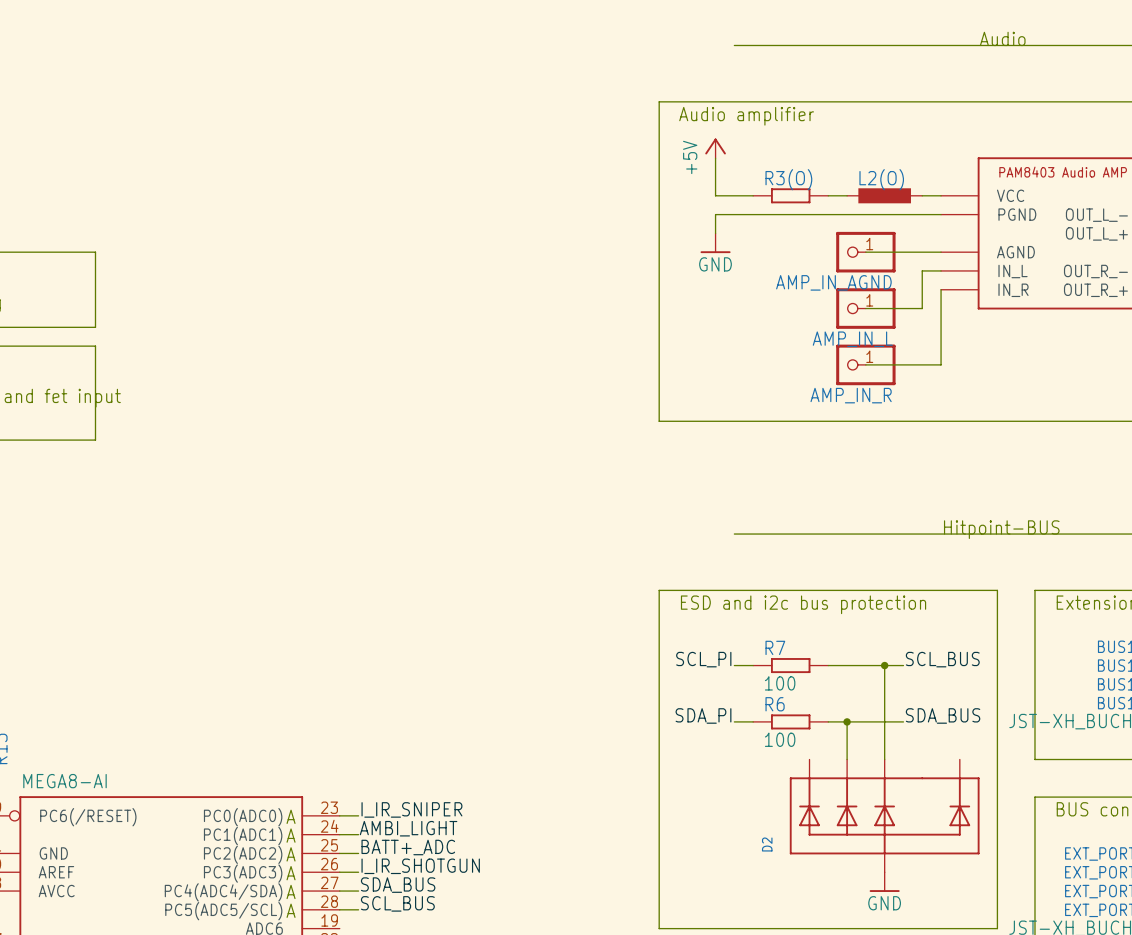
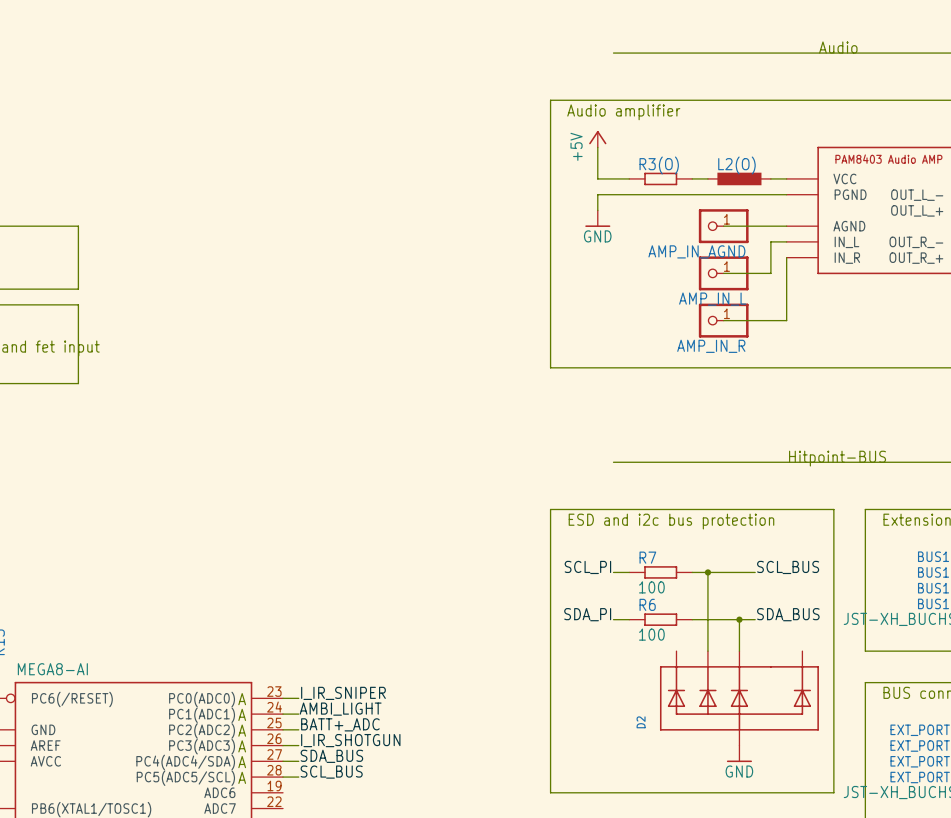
junction: none -> (707, 572)
wire: (884, 665) (884, 721) -> (707, 572) (707, 619)
junction: (884, 665) -> none
junction: (847, 721) -> none
junction: none -> (739, 619)

